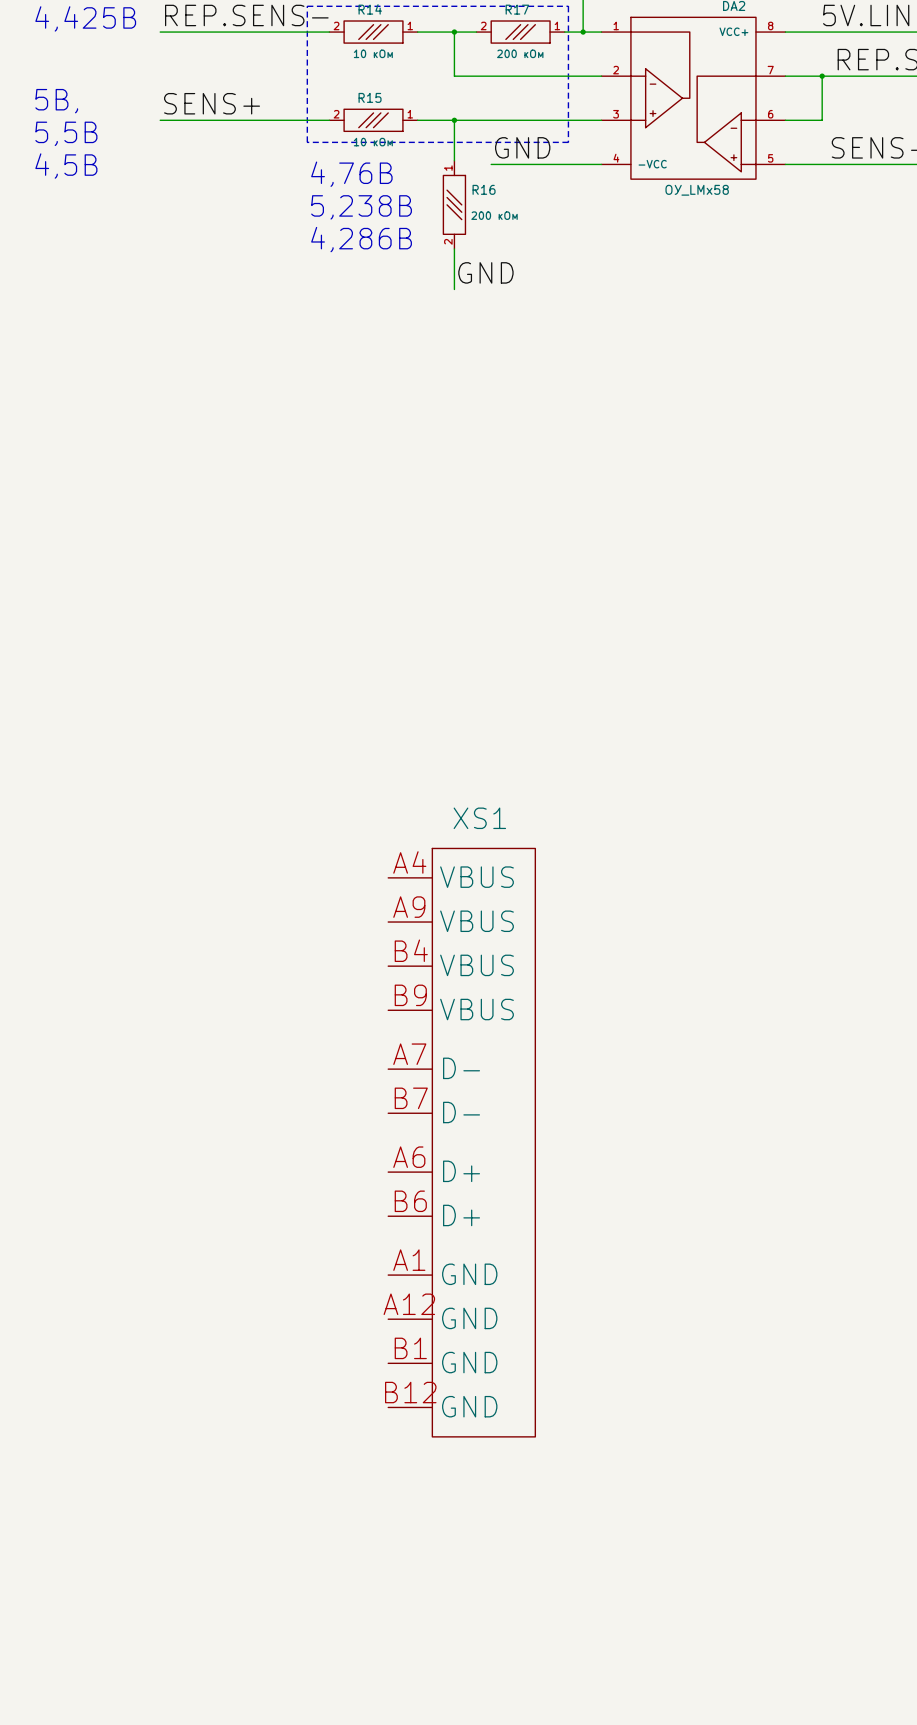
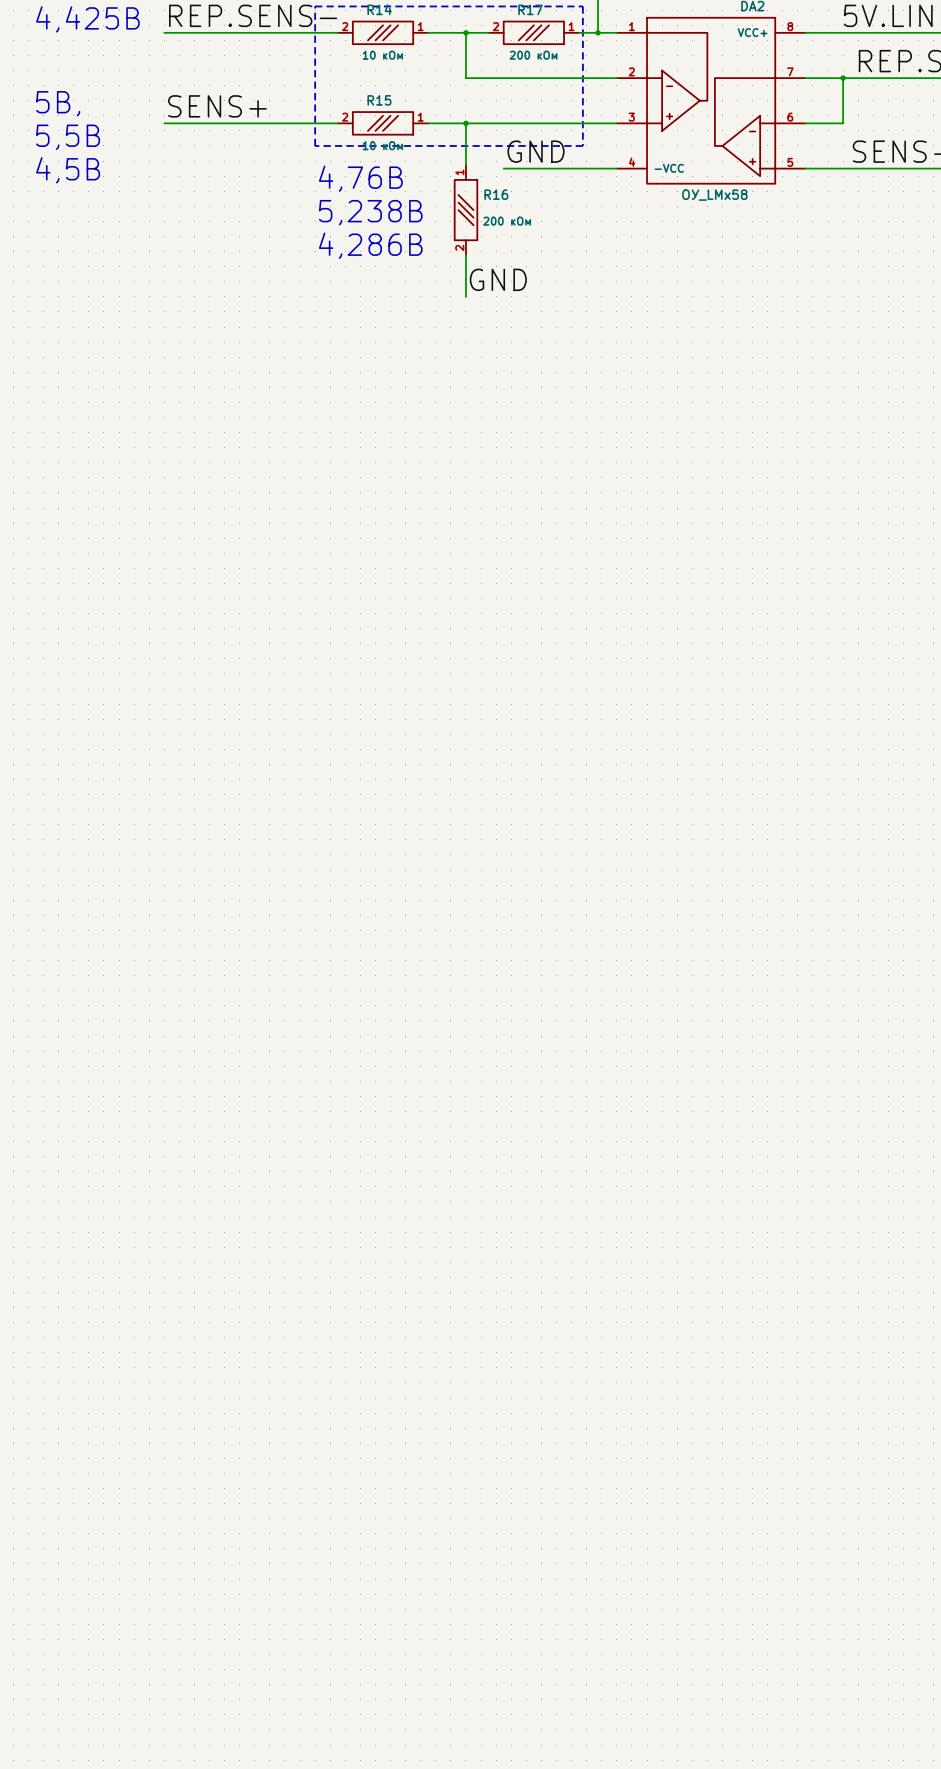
XS1: (461, 1142) -> none

